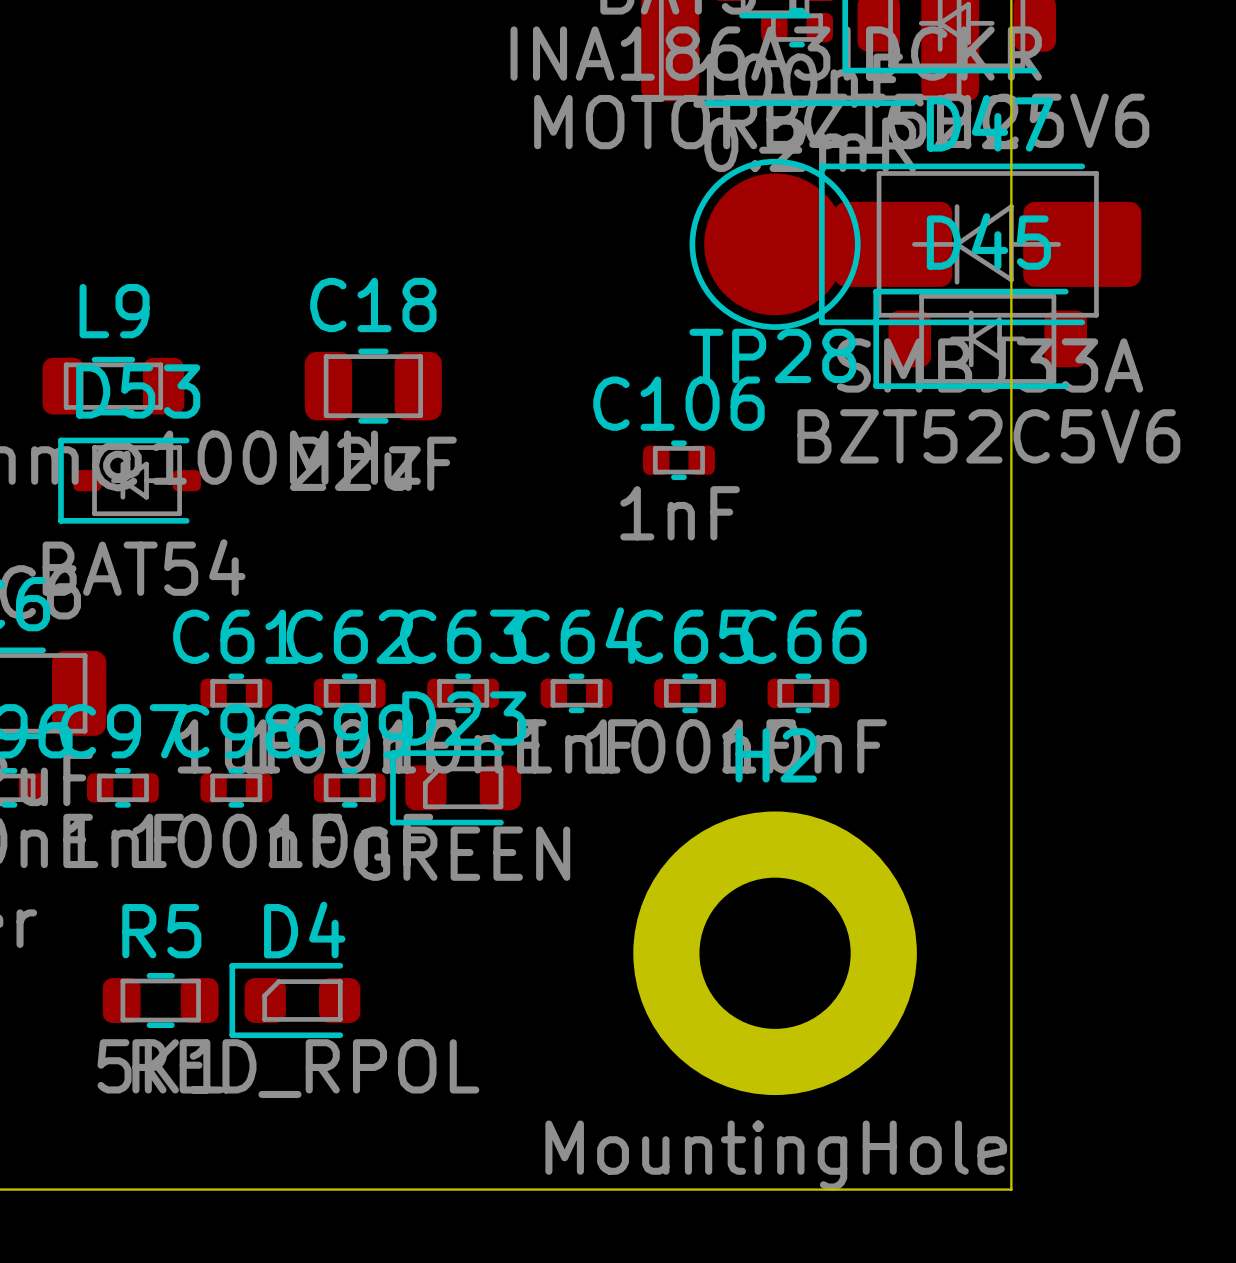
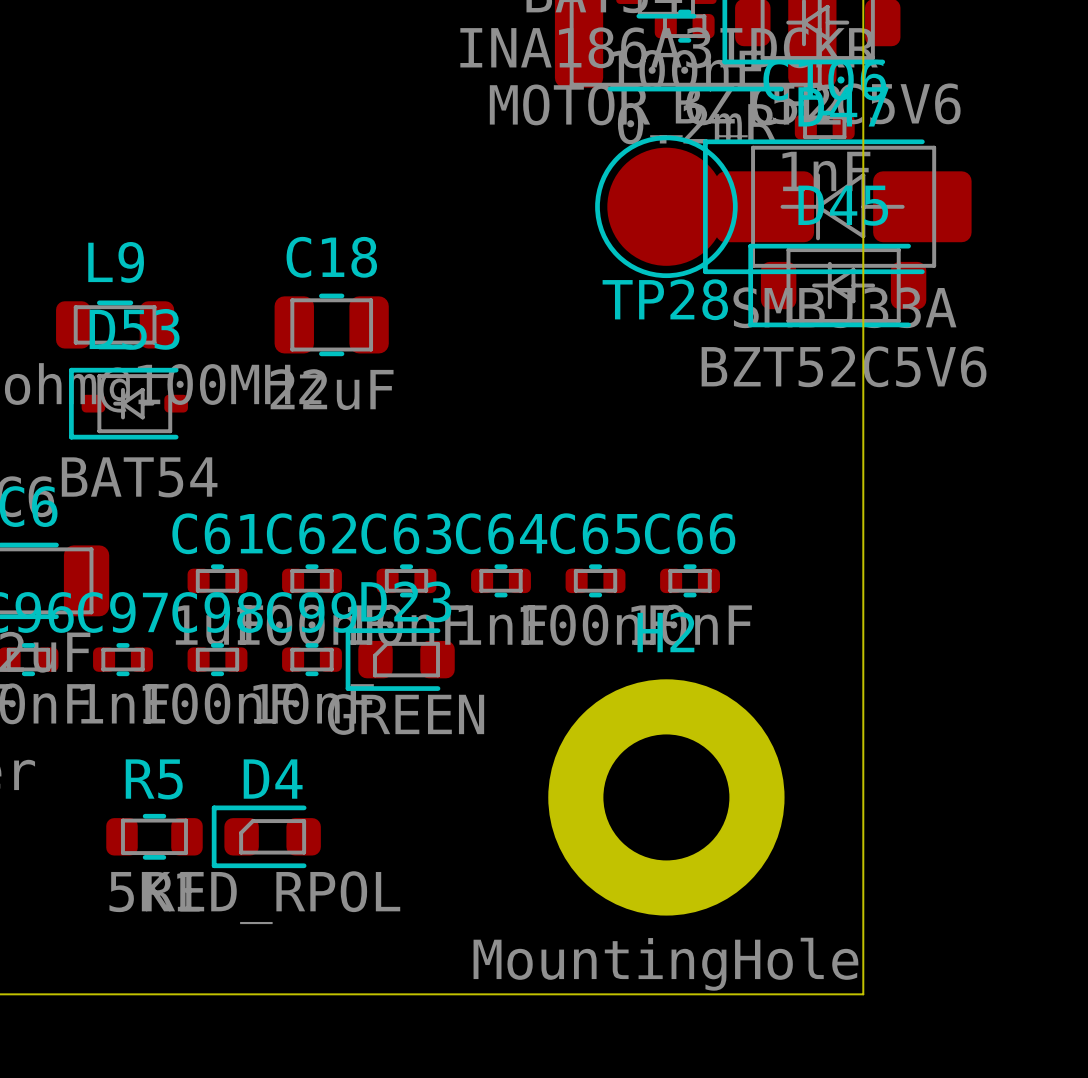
C106 position: (678, 460) -> (824, 127)

